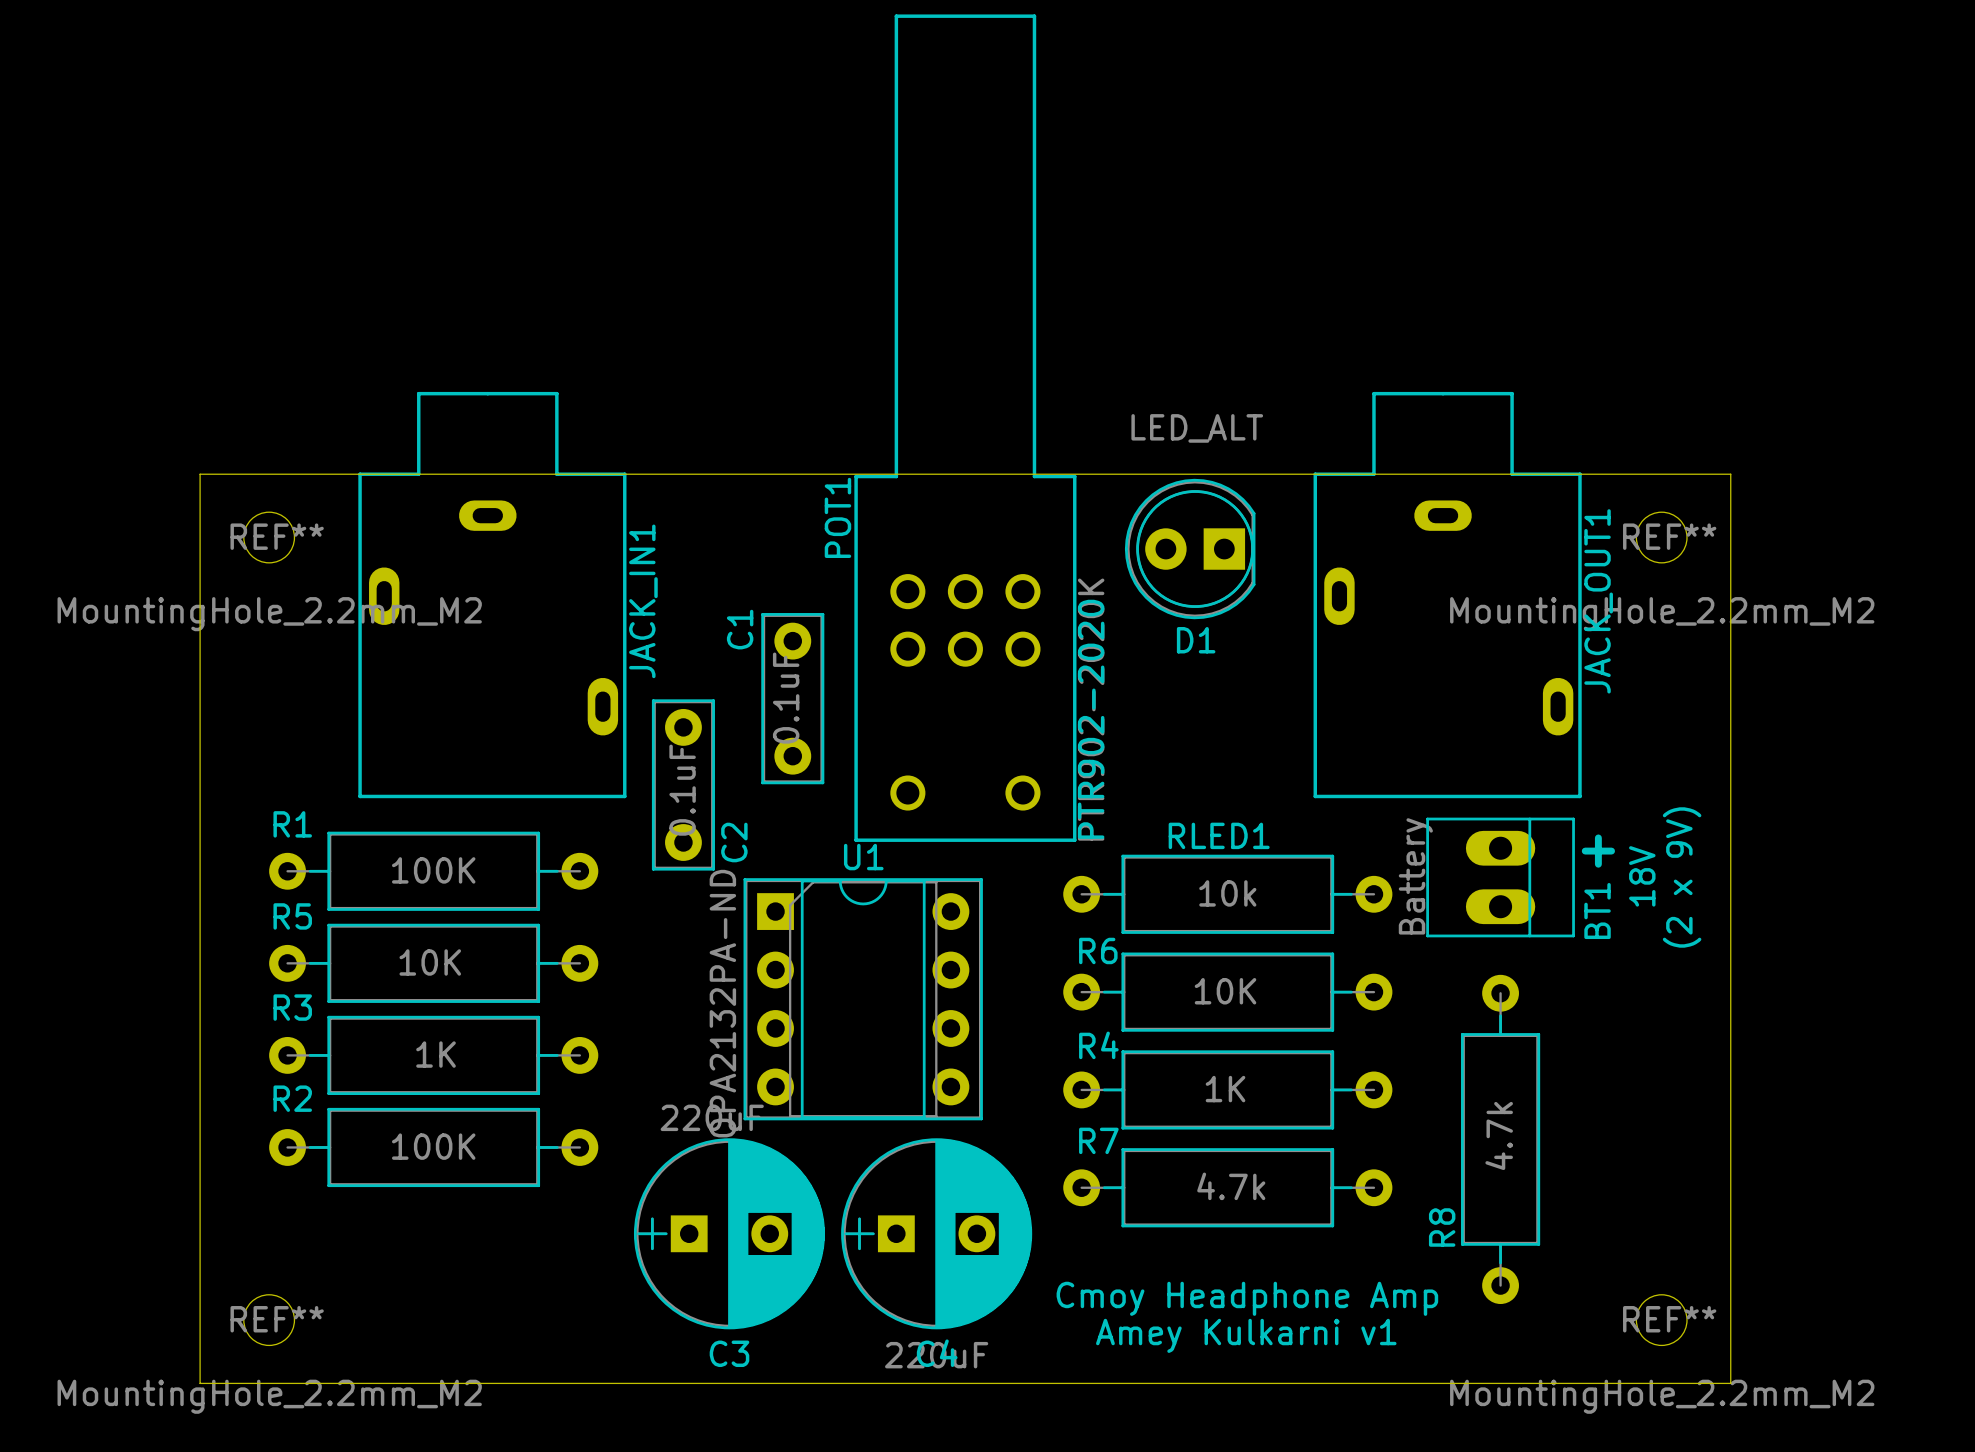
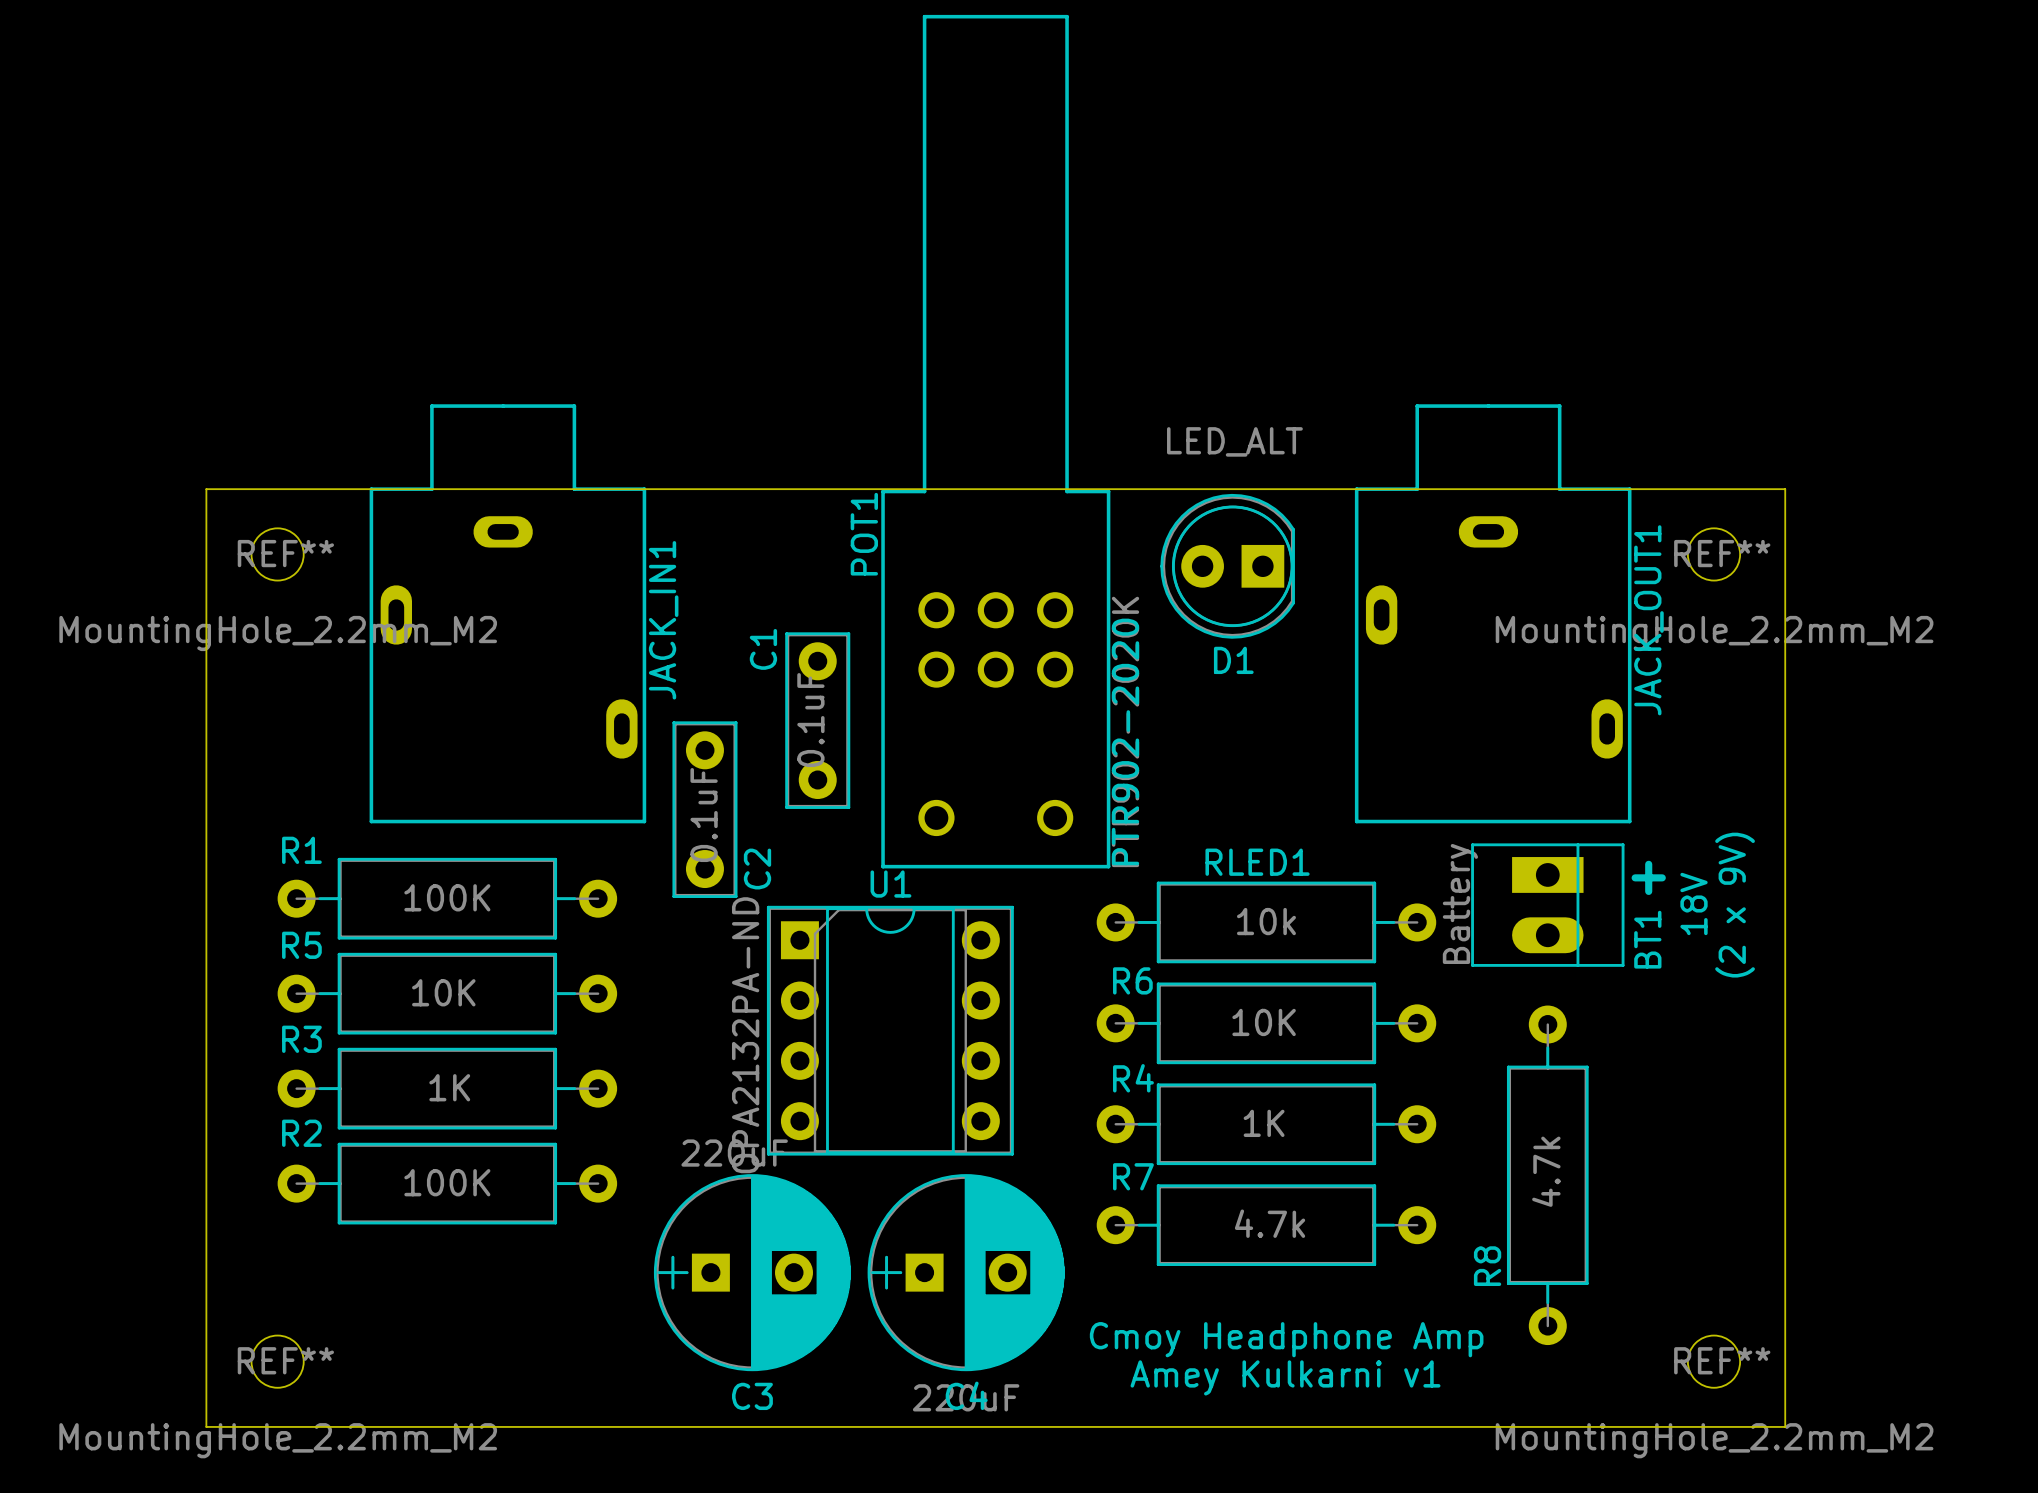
BT1 footprint: [1426, 817, 1575, 938] -> [1471, 843, 1625, 967]

